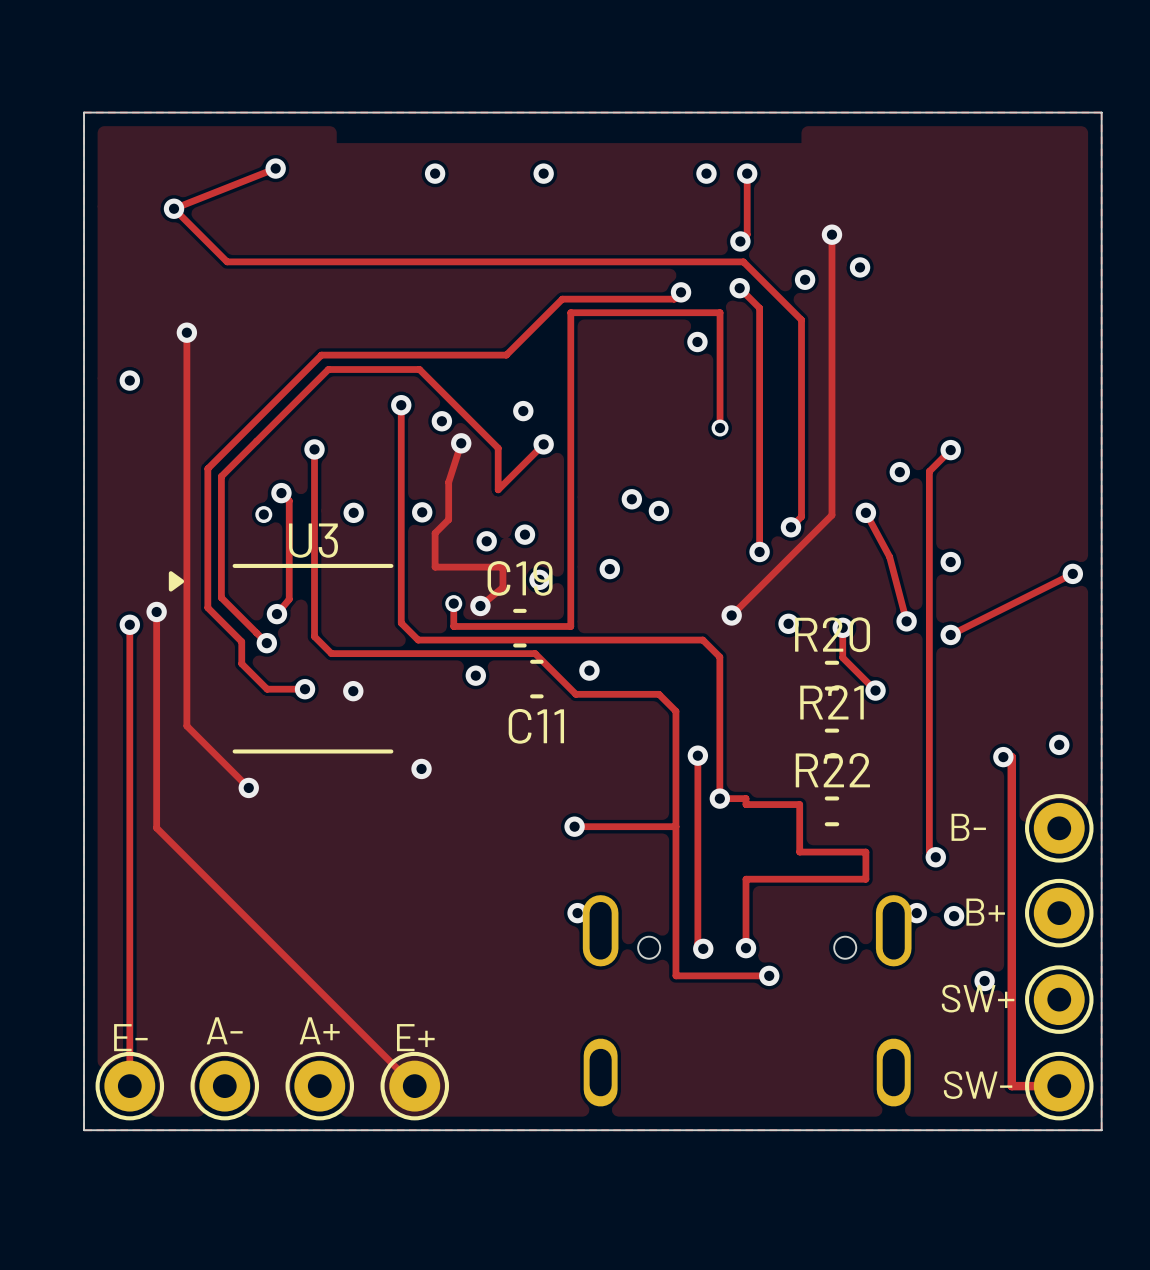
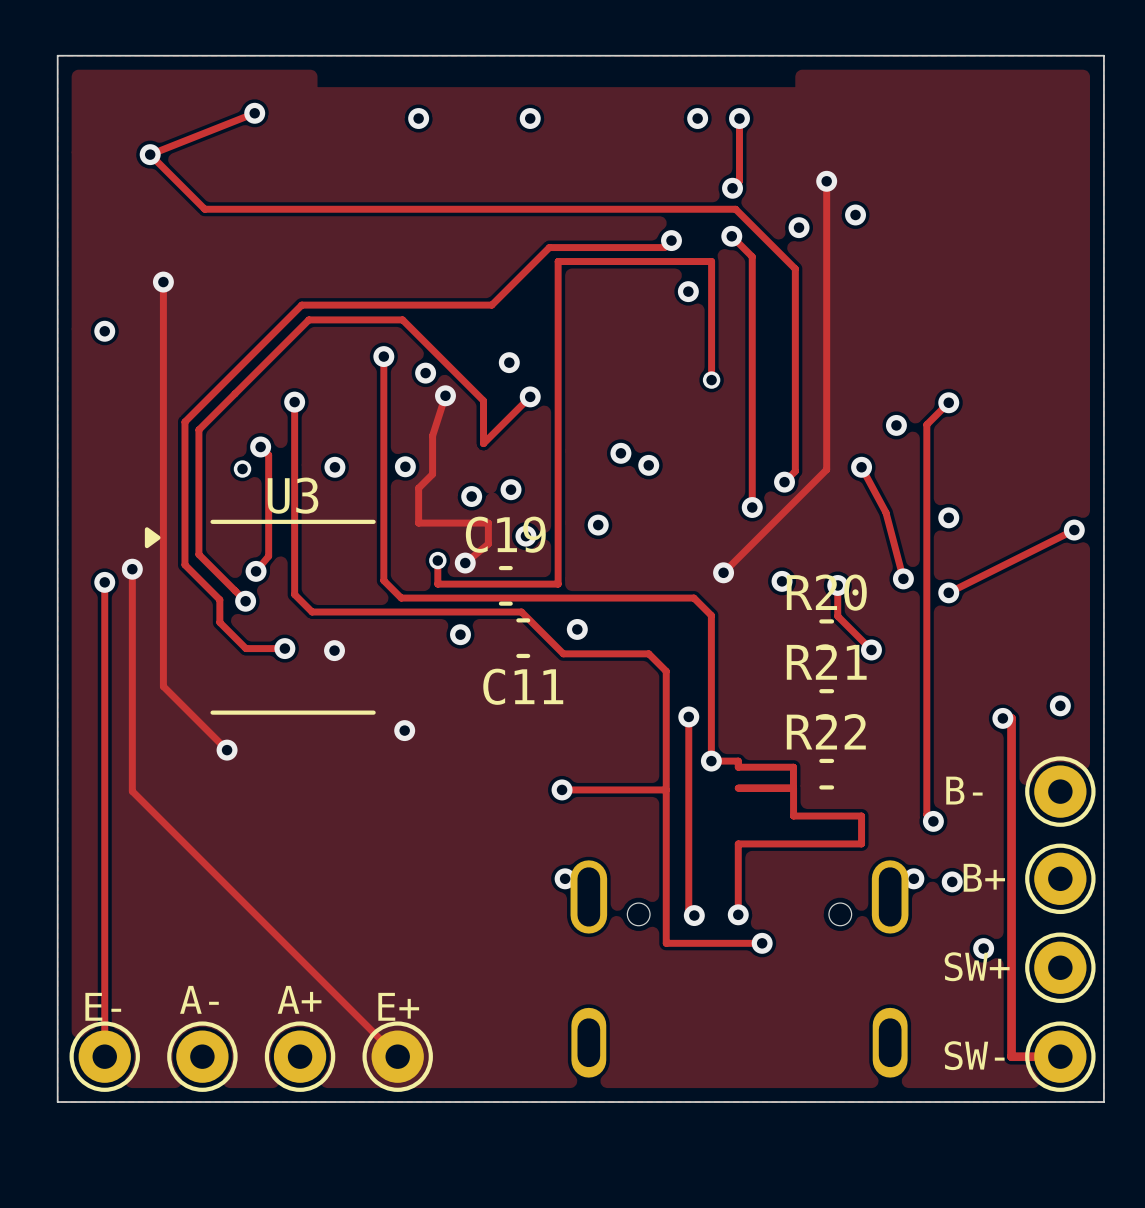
track: none -> (738, 788) (793, 788)

